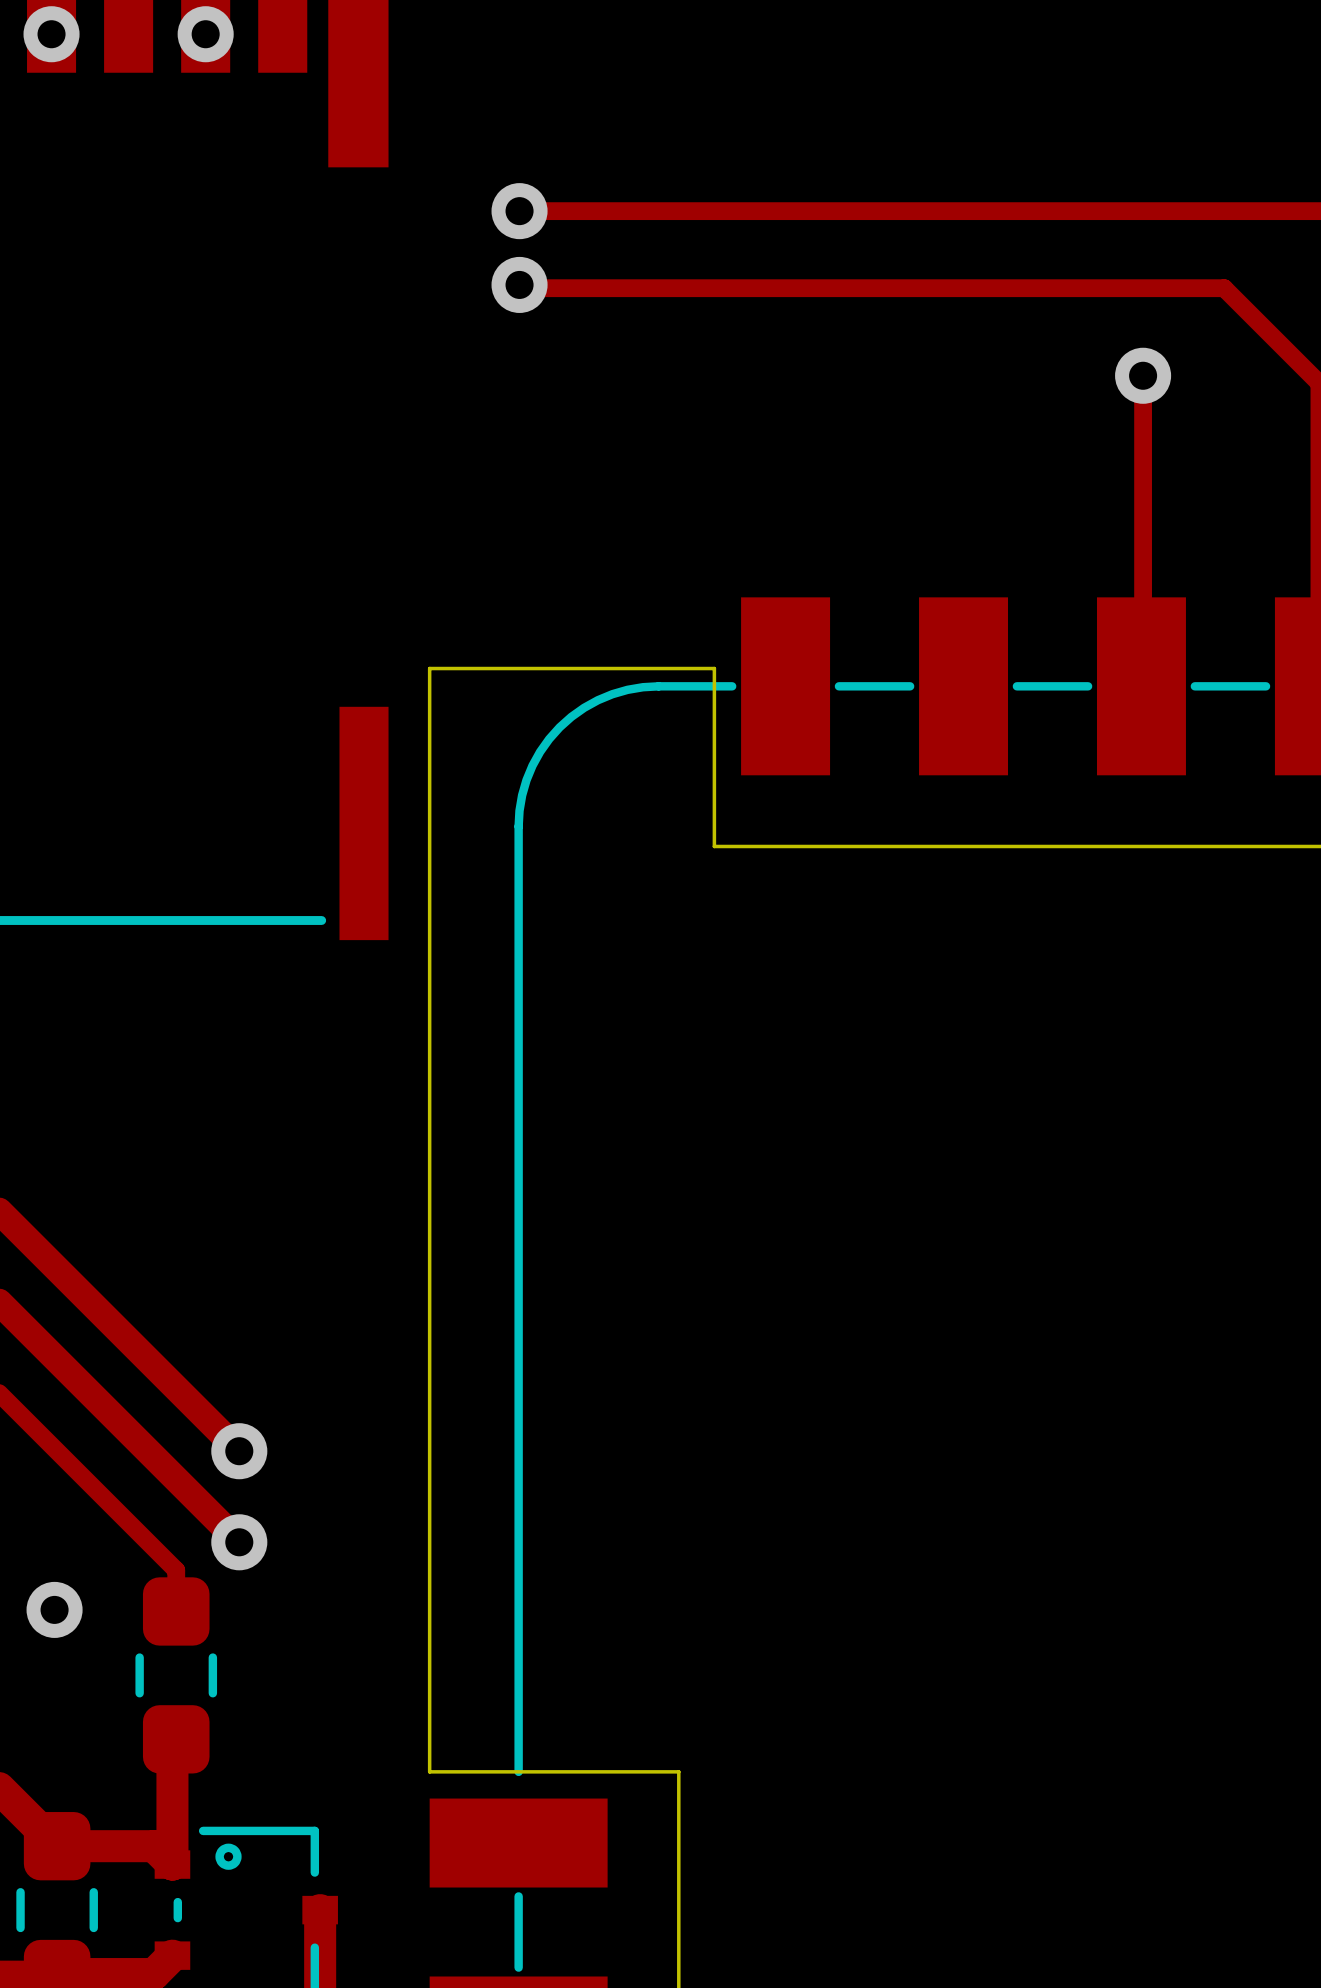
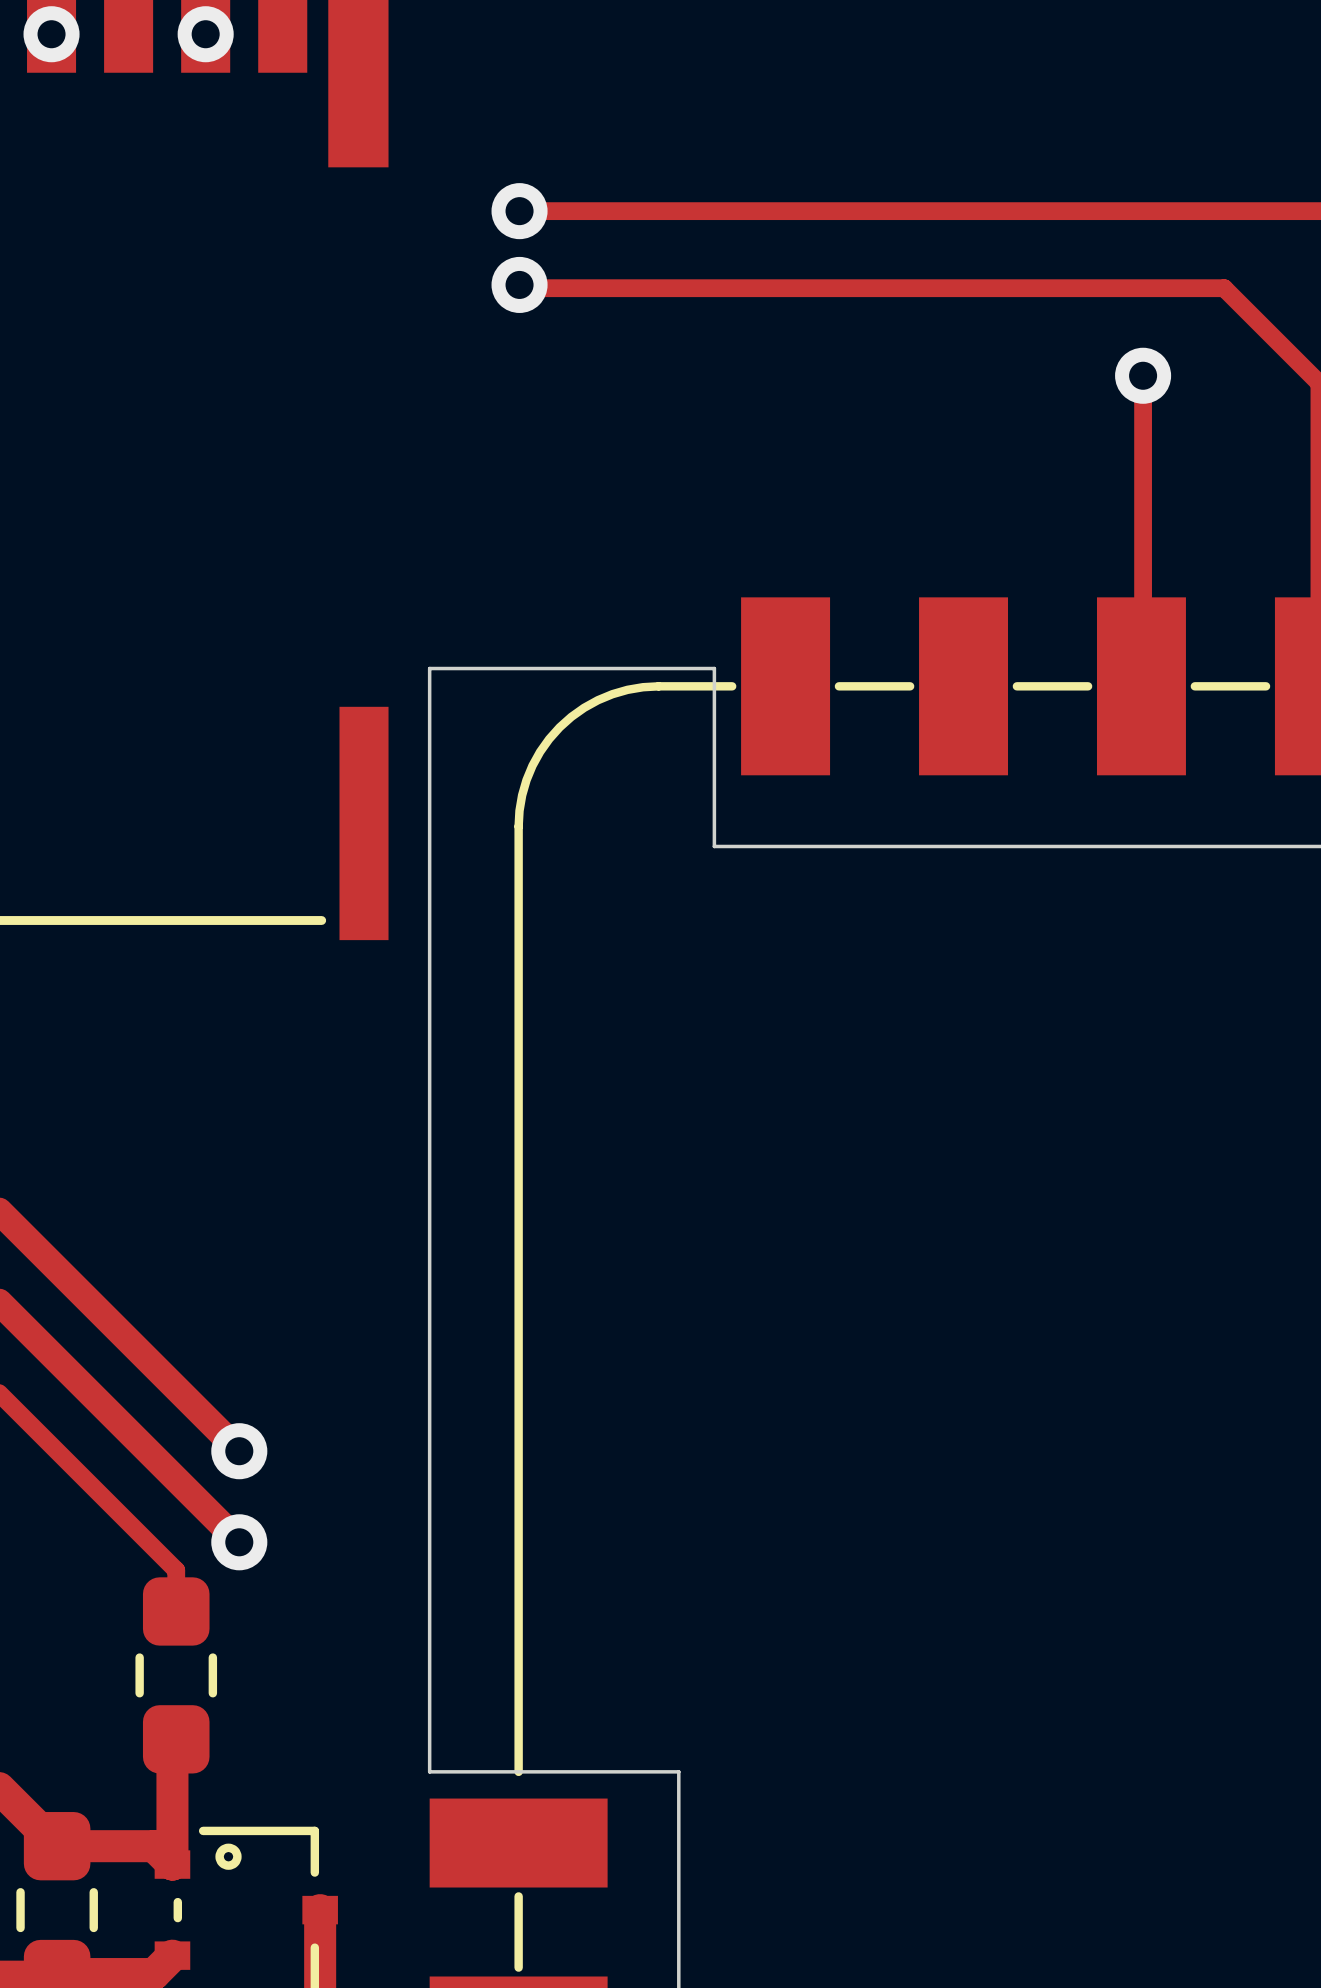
via: (54, 1609) -> none

